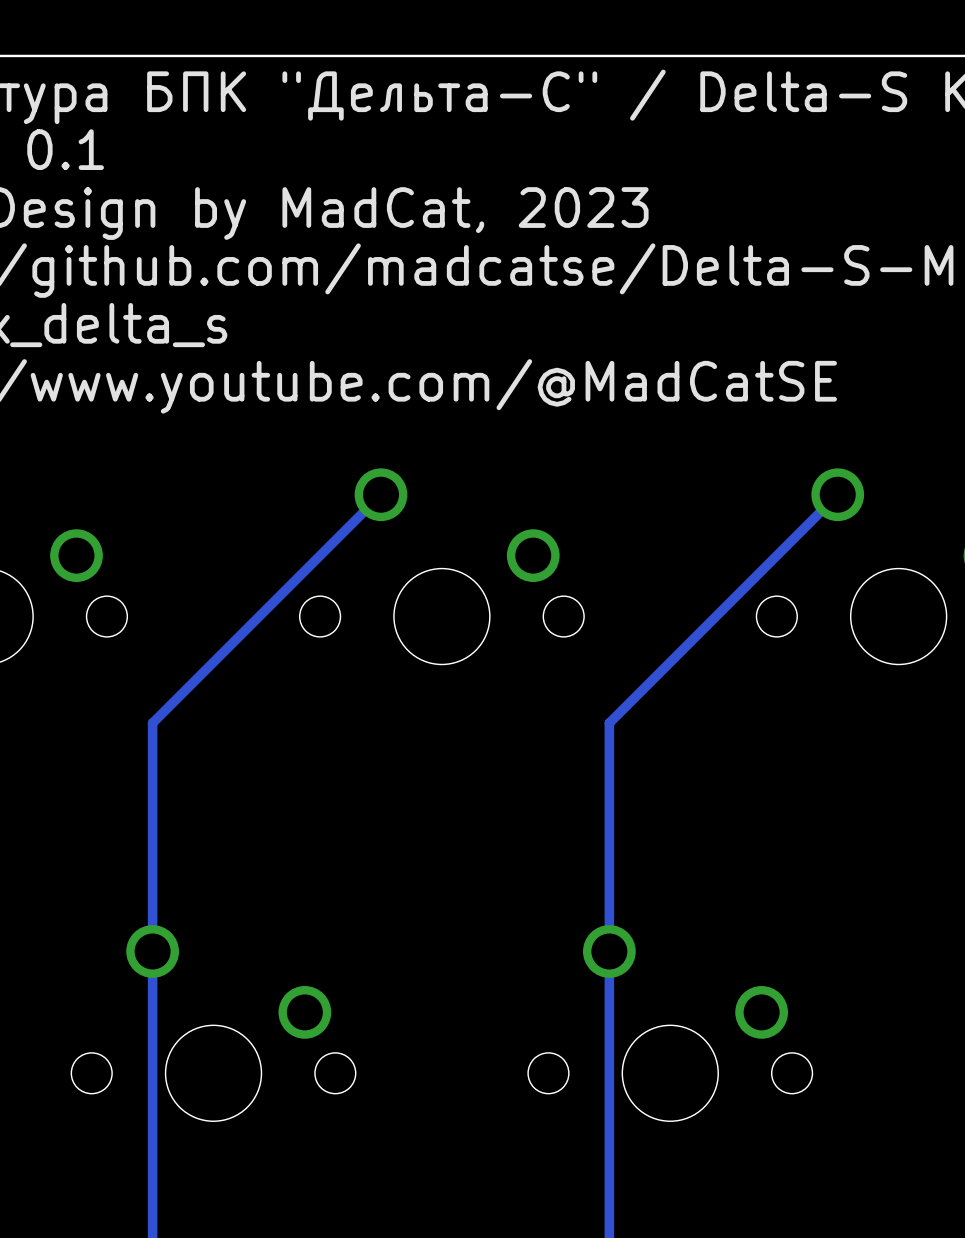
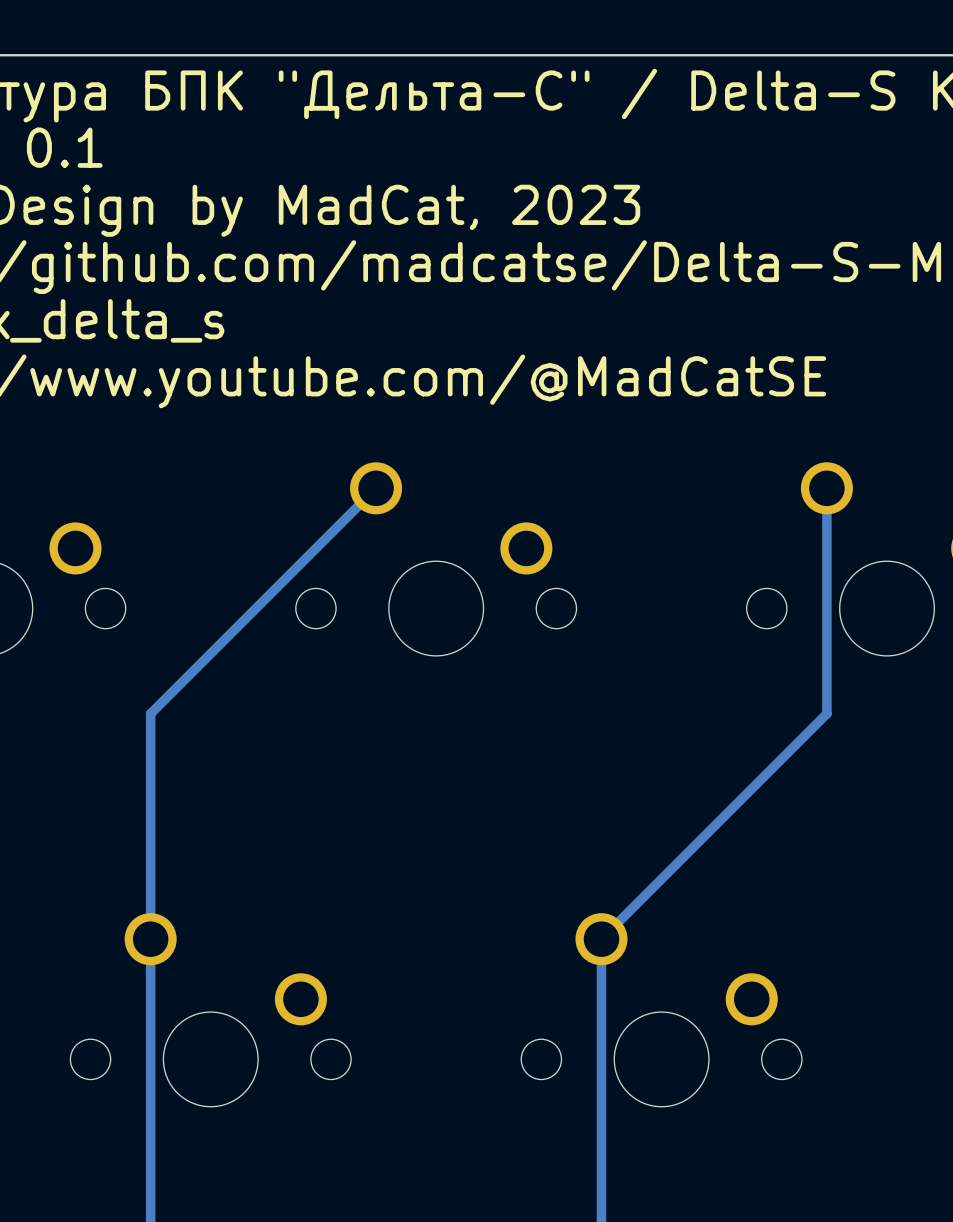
track: (837, 494) (609, 723) (609, 951) -> (826, 488) (826, 713) (601, 939)

